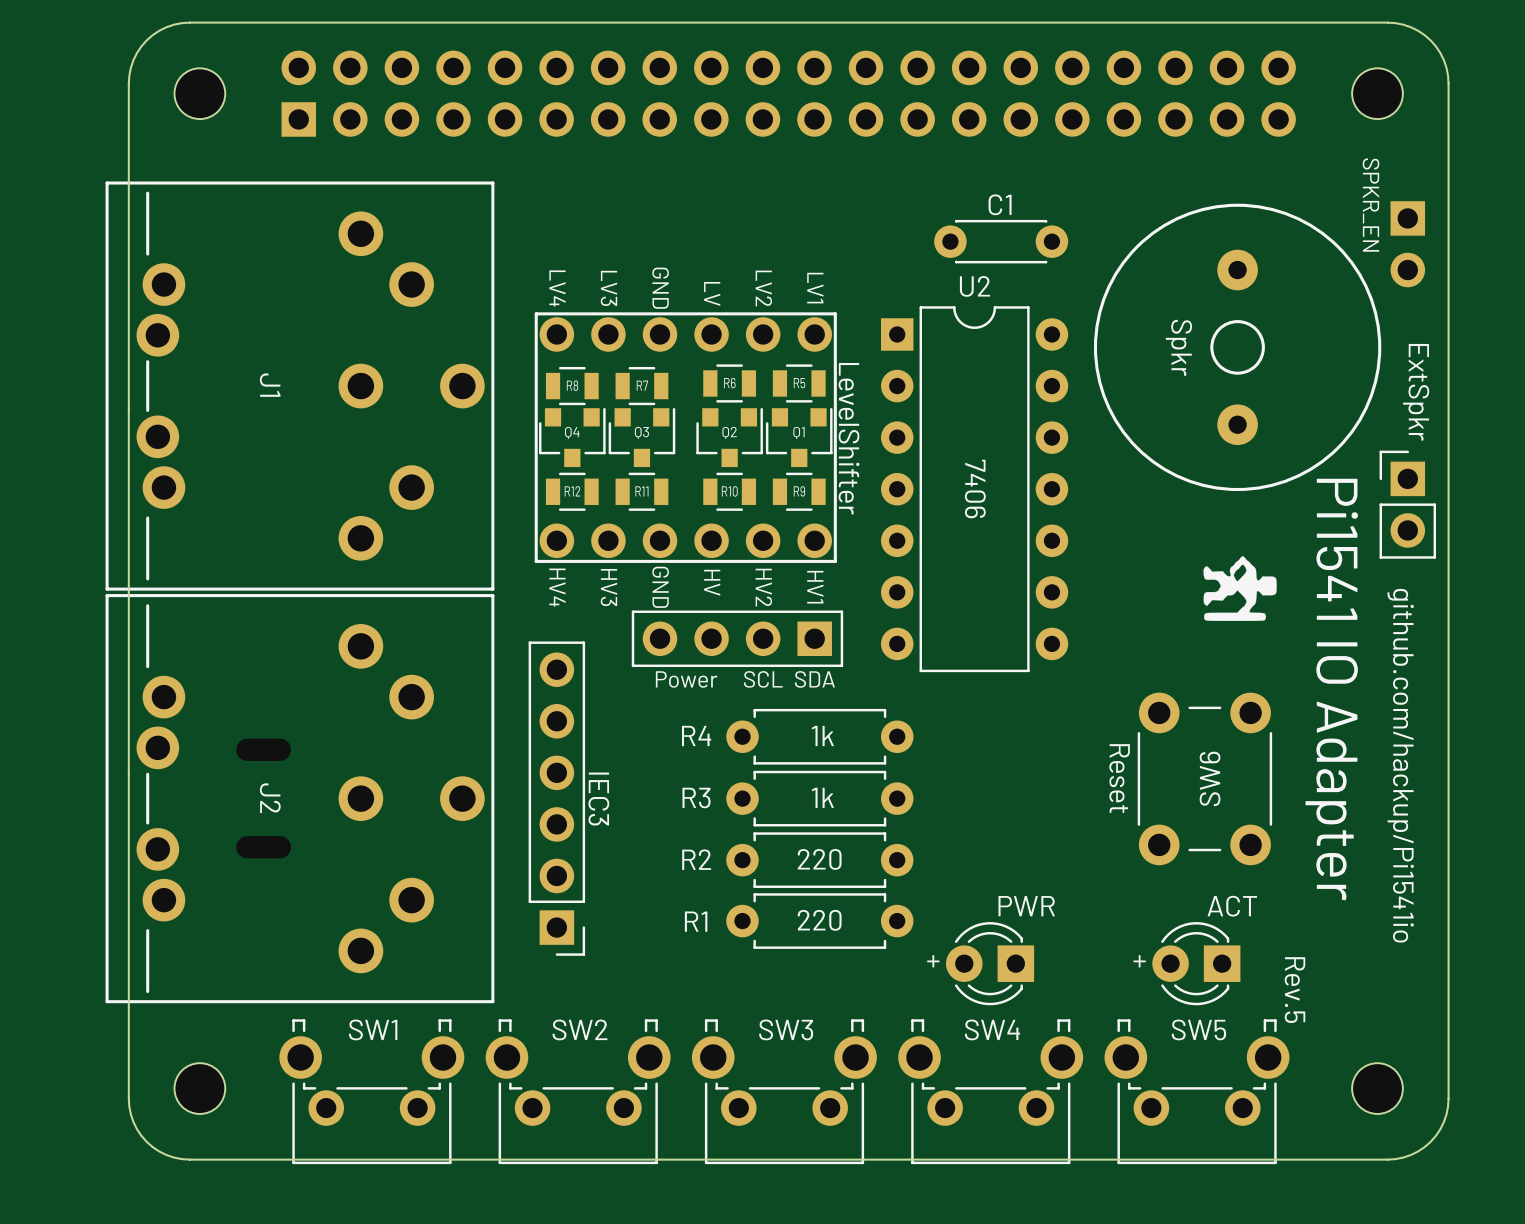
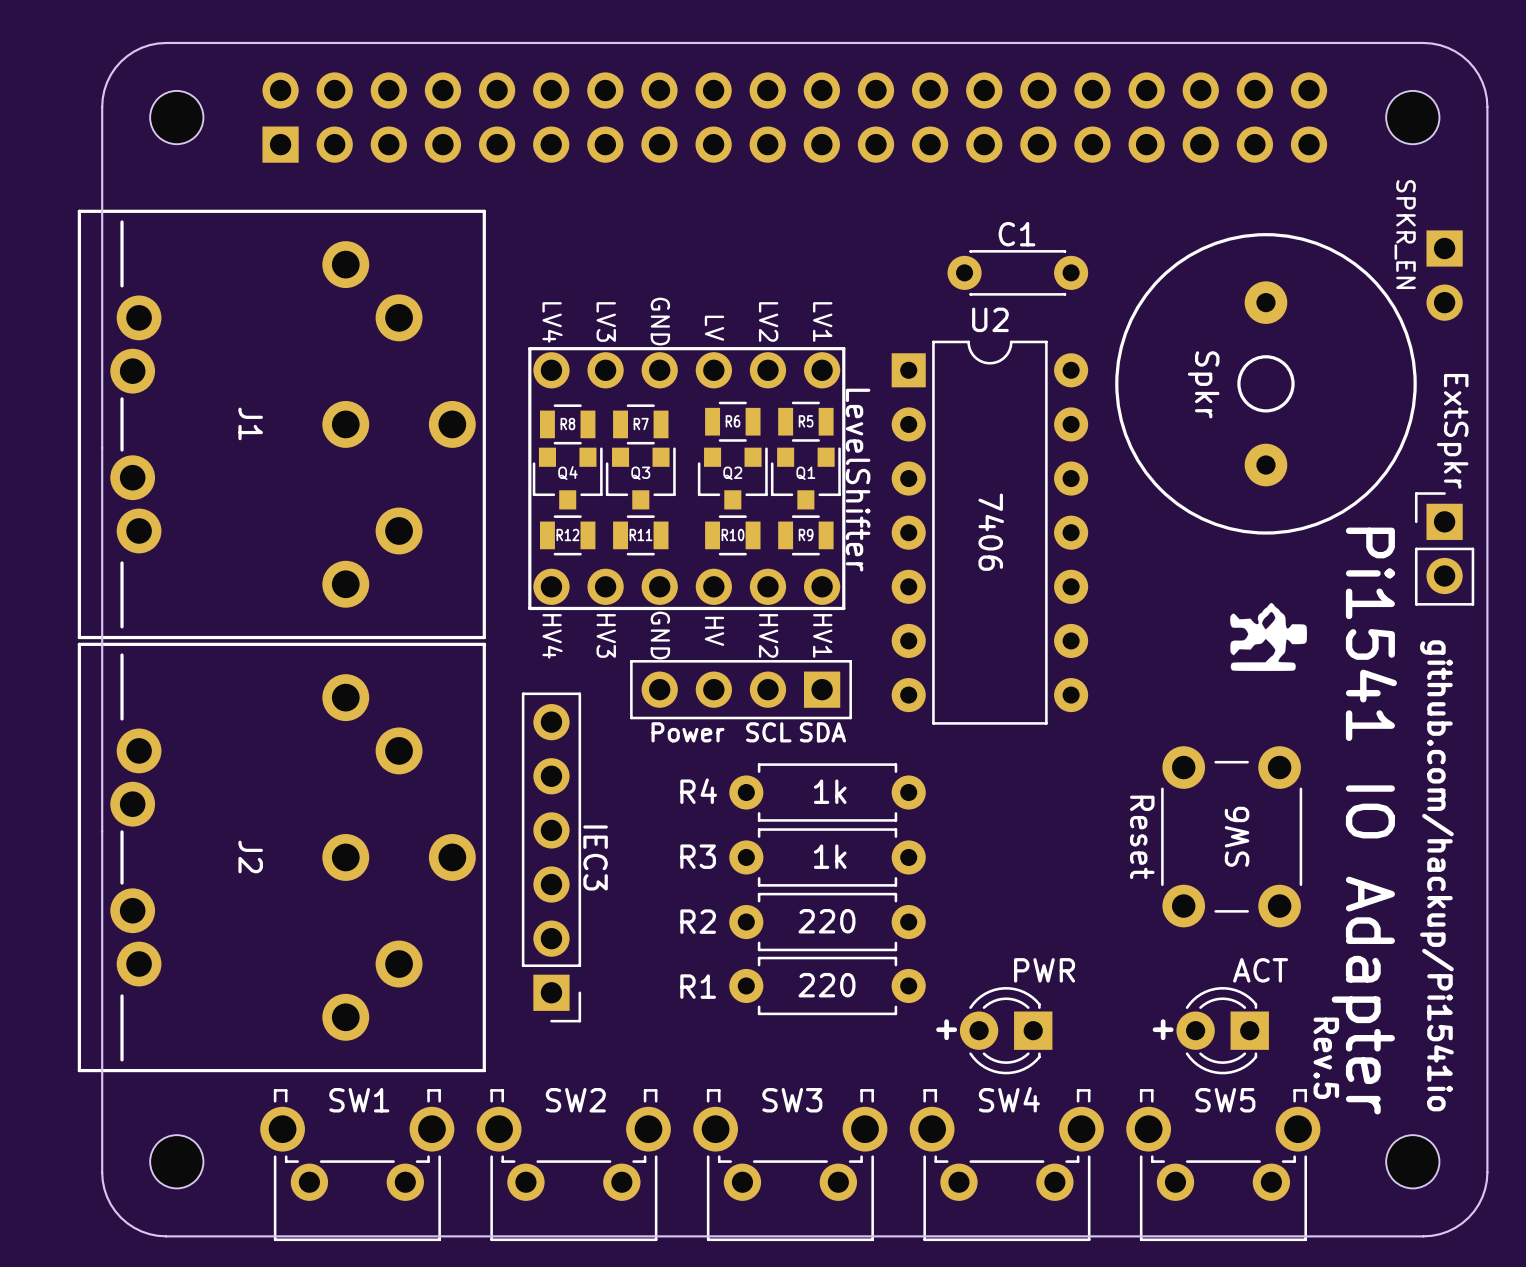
part: (263, 749) -> none
part: (263, 847) -> none

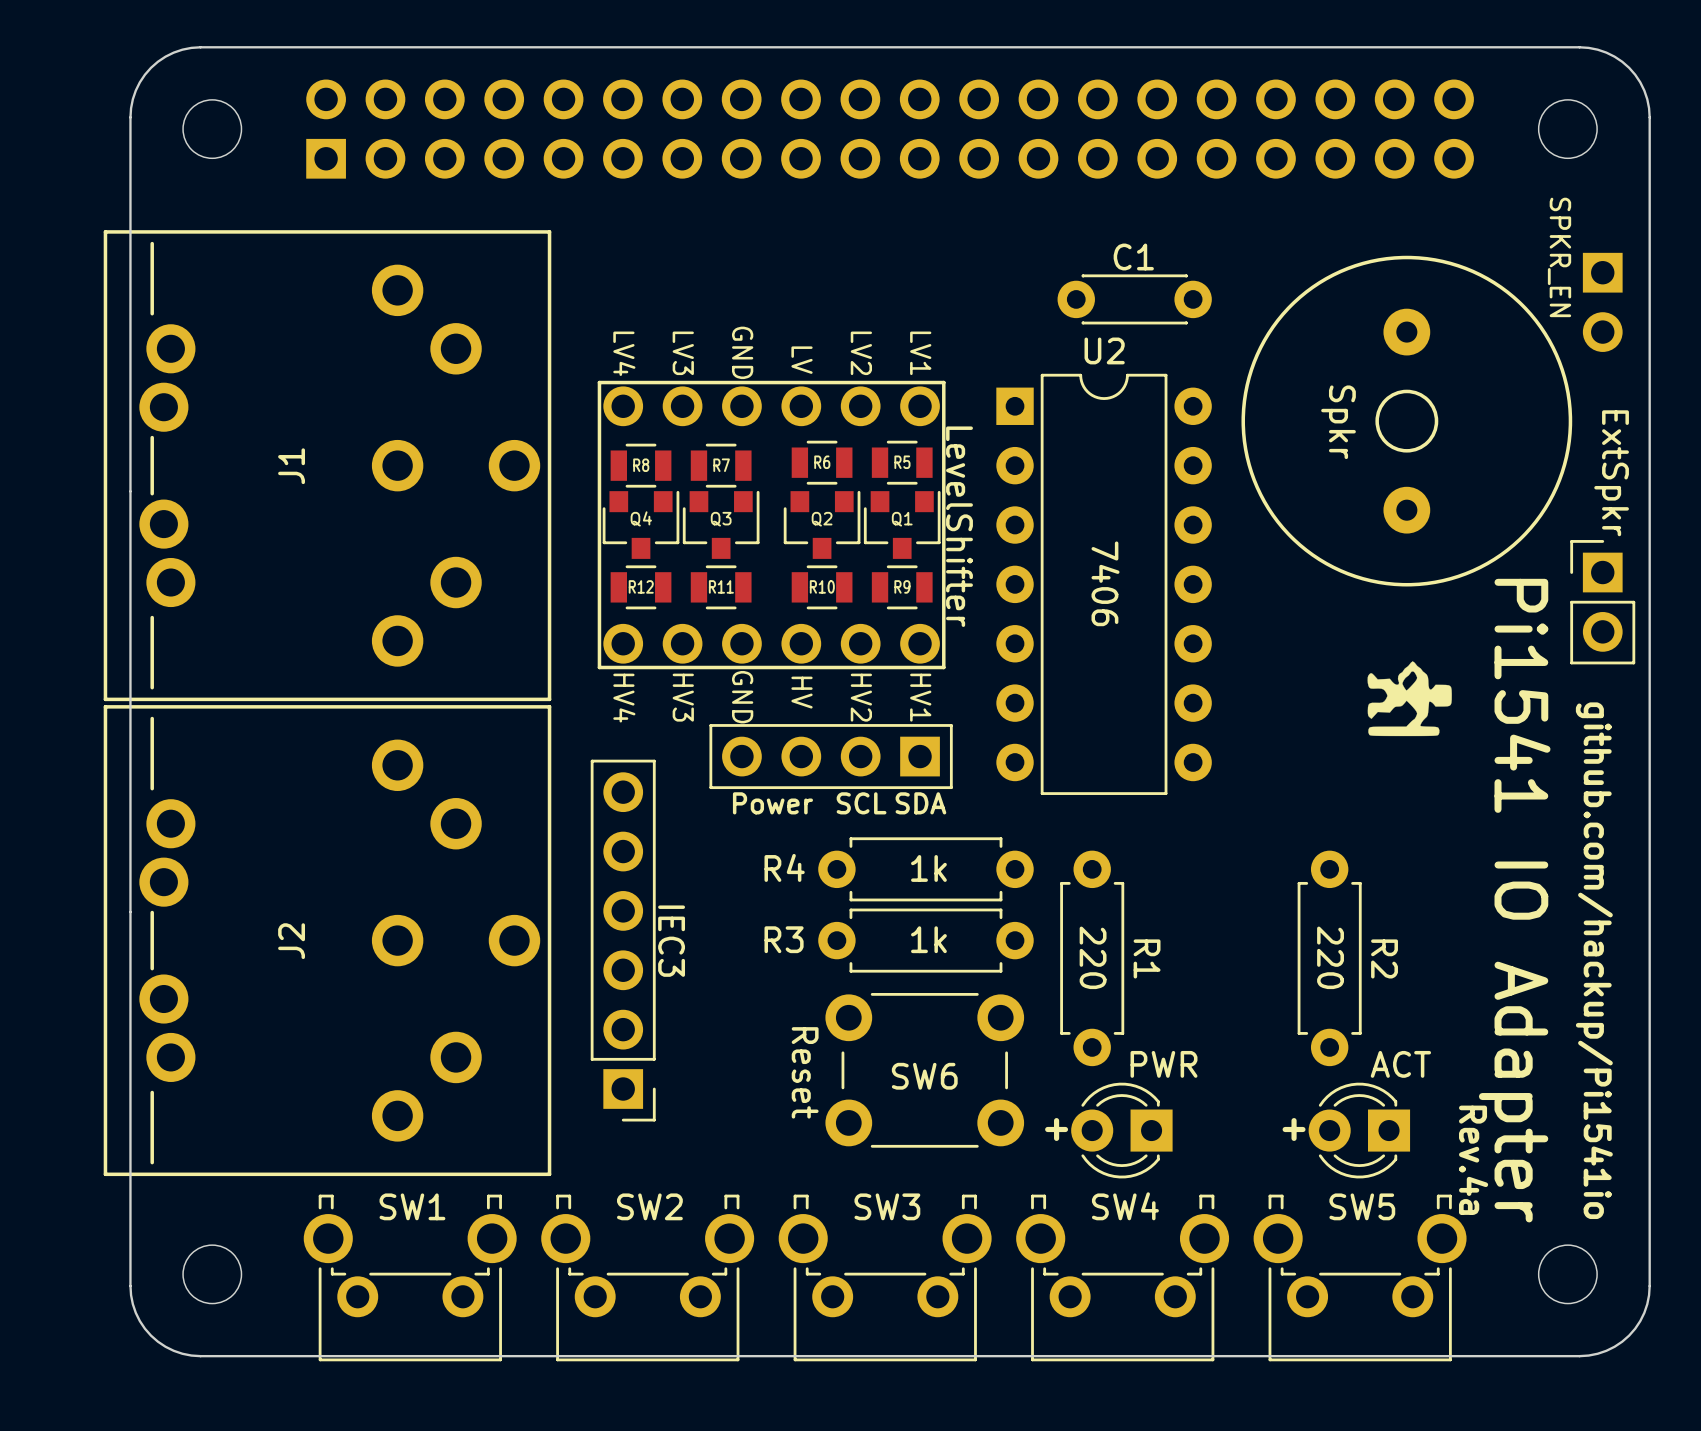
J1 name rotation: 0° (250, 423) -> 180° (291, 466)
SW6 rotation: 0° (1231, 836) -> 90° clockwise (924, 1070)
SW6 position: (1231, 836) -> (924, 1070)
J2 name rotation: 0° (250, 856) -> 180° (291, 941)
R2 name position: R2 (698, 921) -> R2 (1384, 958)
R2 rotation: 0° (827, 922) -> 90° clockwise (1329, 958)
R2 position: (827, 922) -> (1329, 958)
R1 rotation: 0° (827, 985) -> 90° clockwise (1092, 958)
R1 position: (827, 985) -> (1092, 958)
R1 name position: R1 (698, 986) -> R1 (1147, 958)
text: Rev.5 (1326, 1058) -> Rev.4a (1473, 1160)

